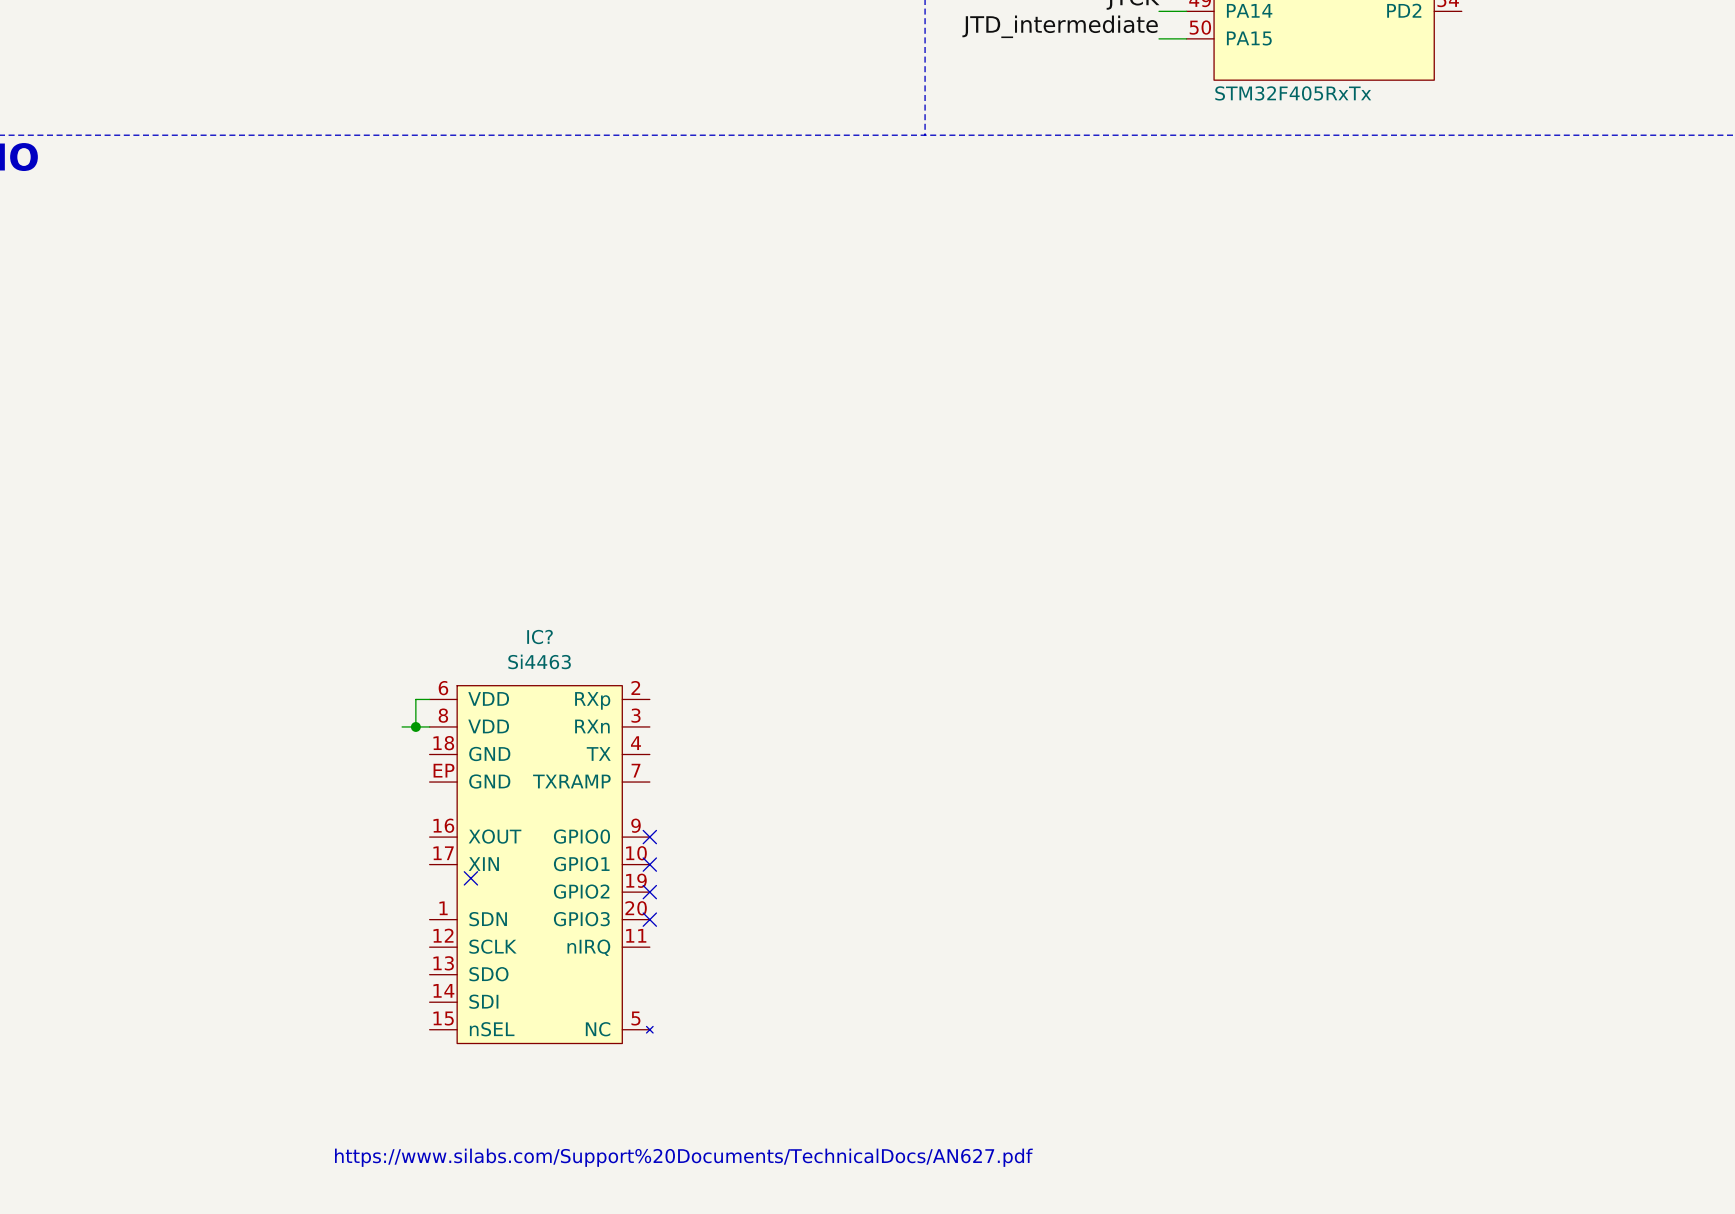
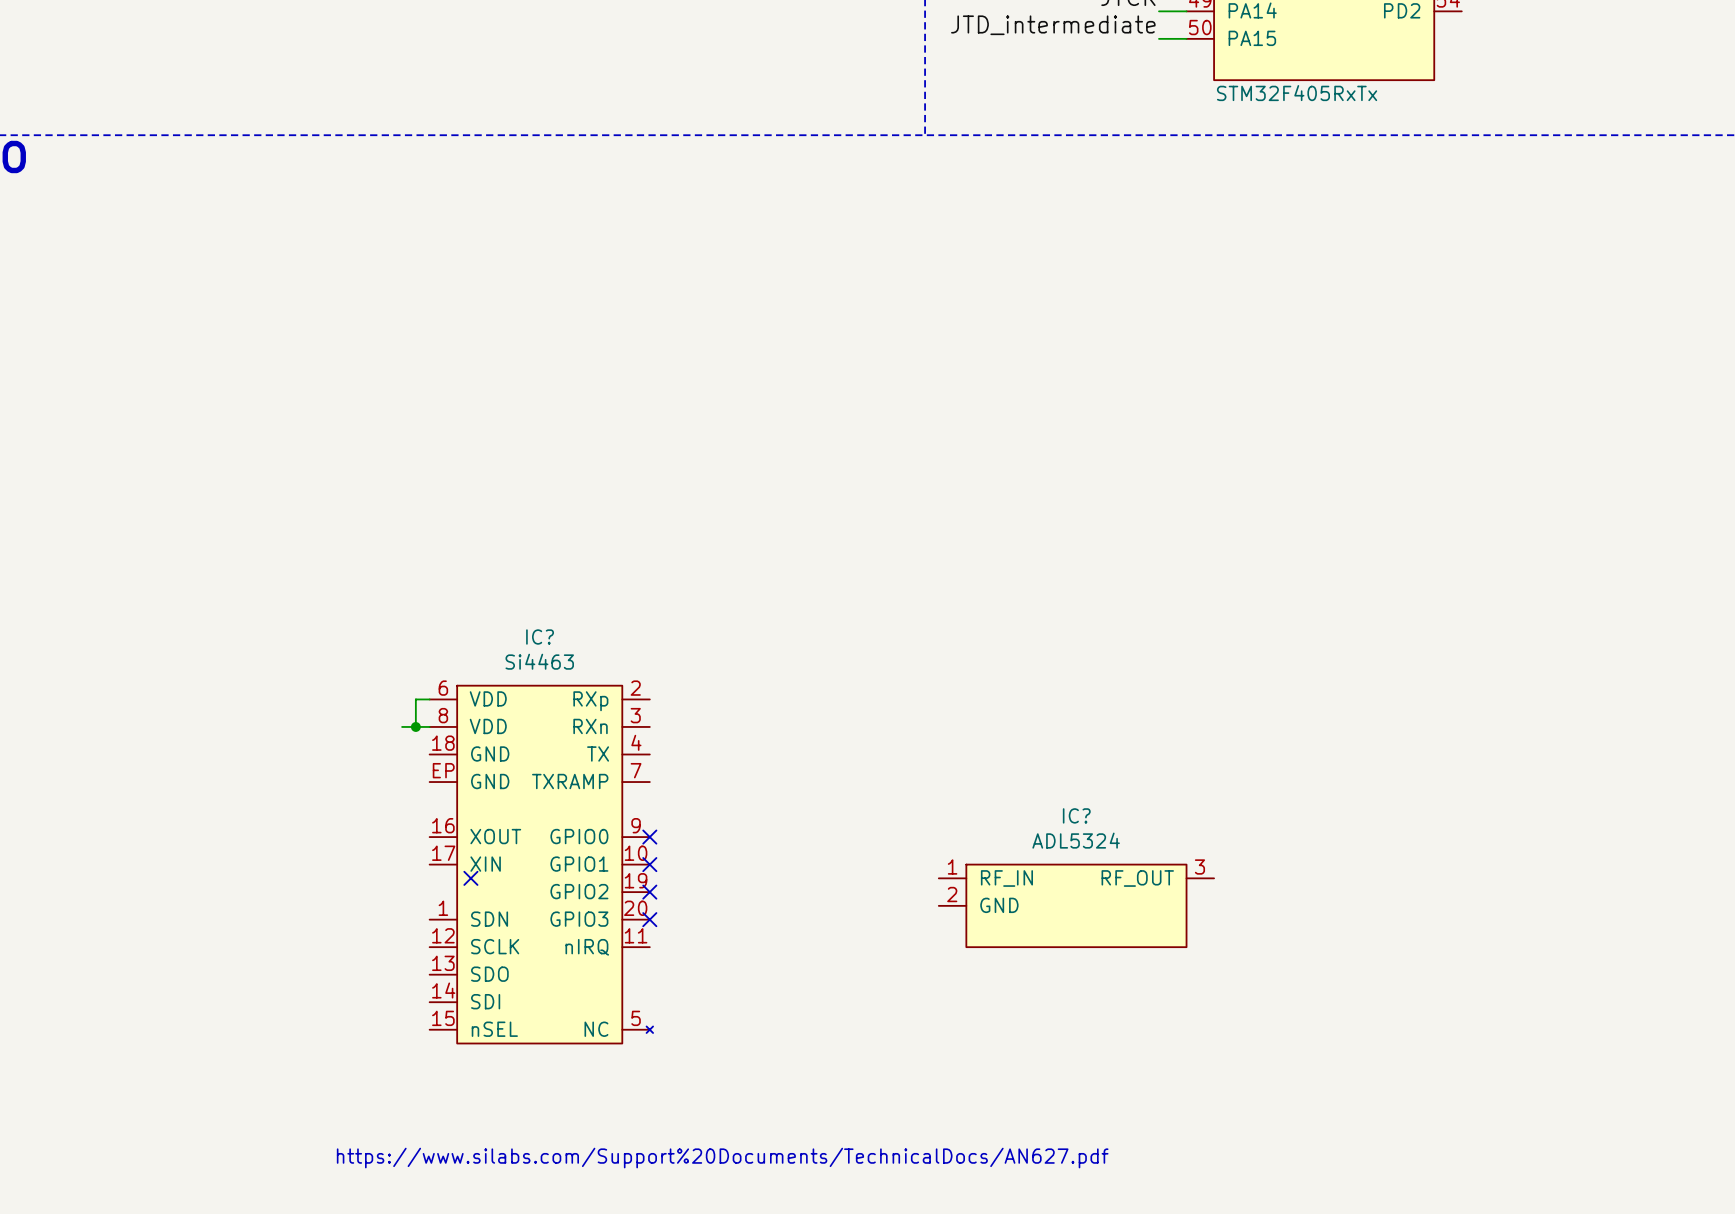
IC?: none -> ADL5324 (1076, 905)

